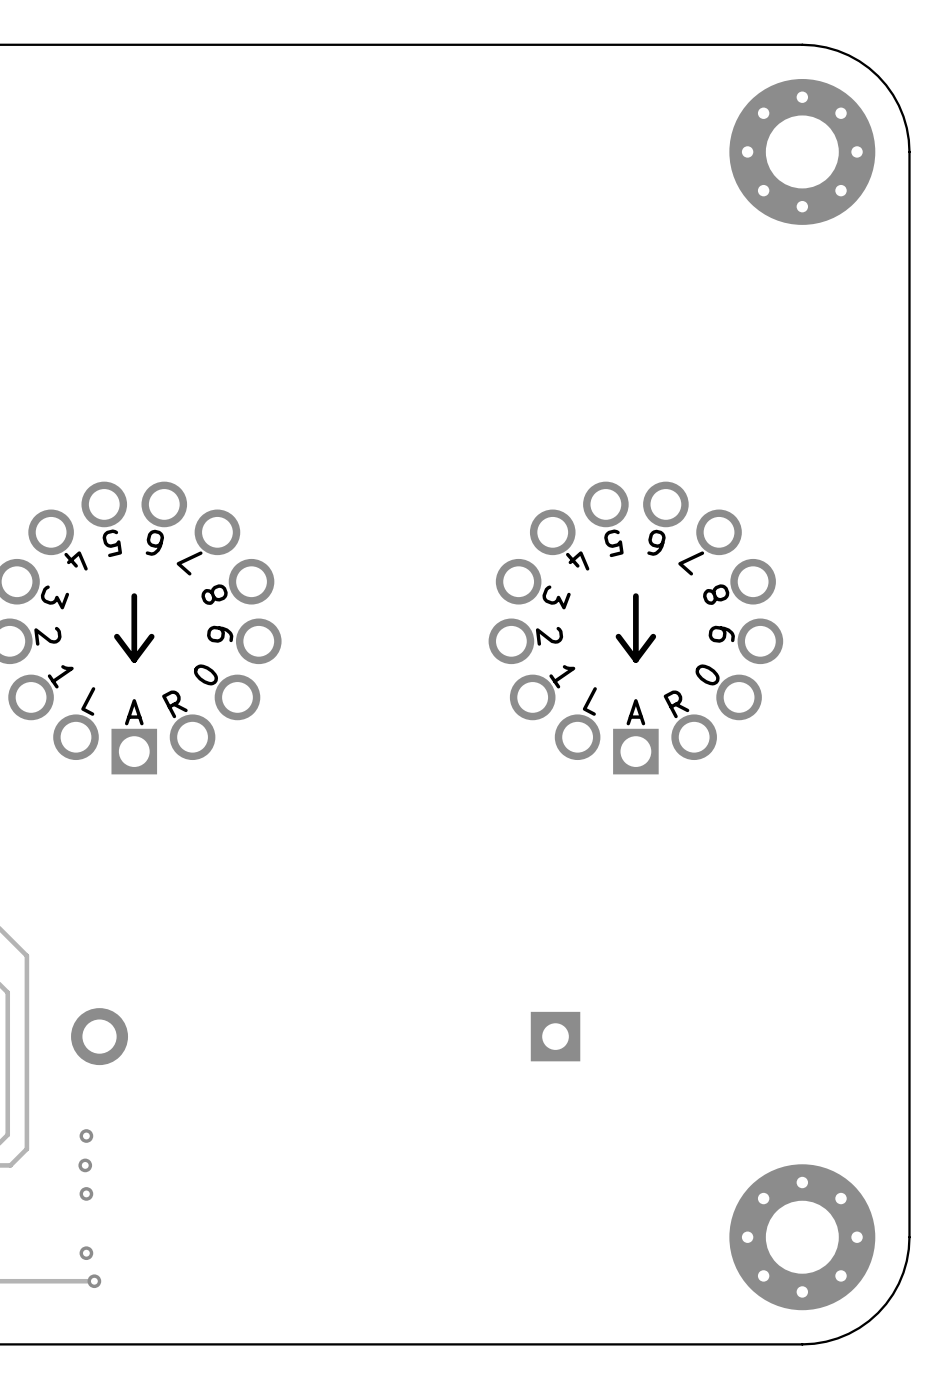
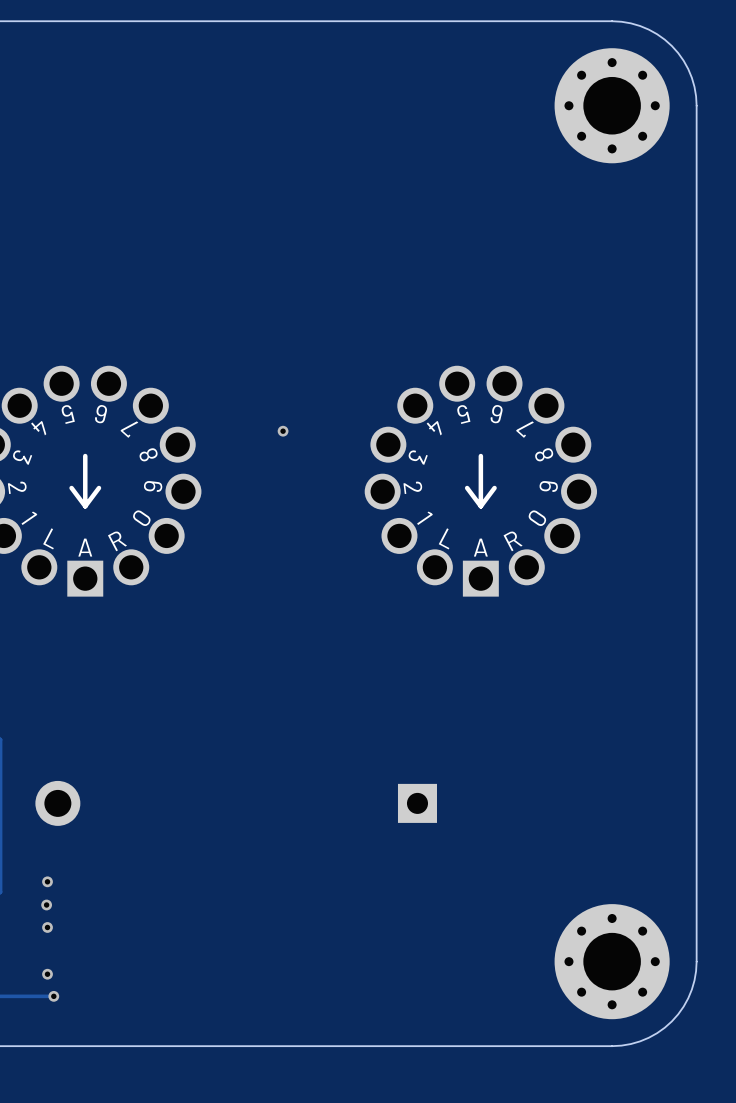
via: none -> (283, 431)

